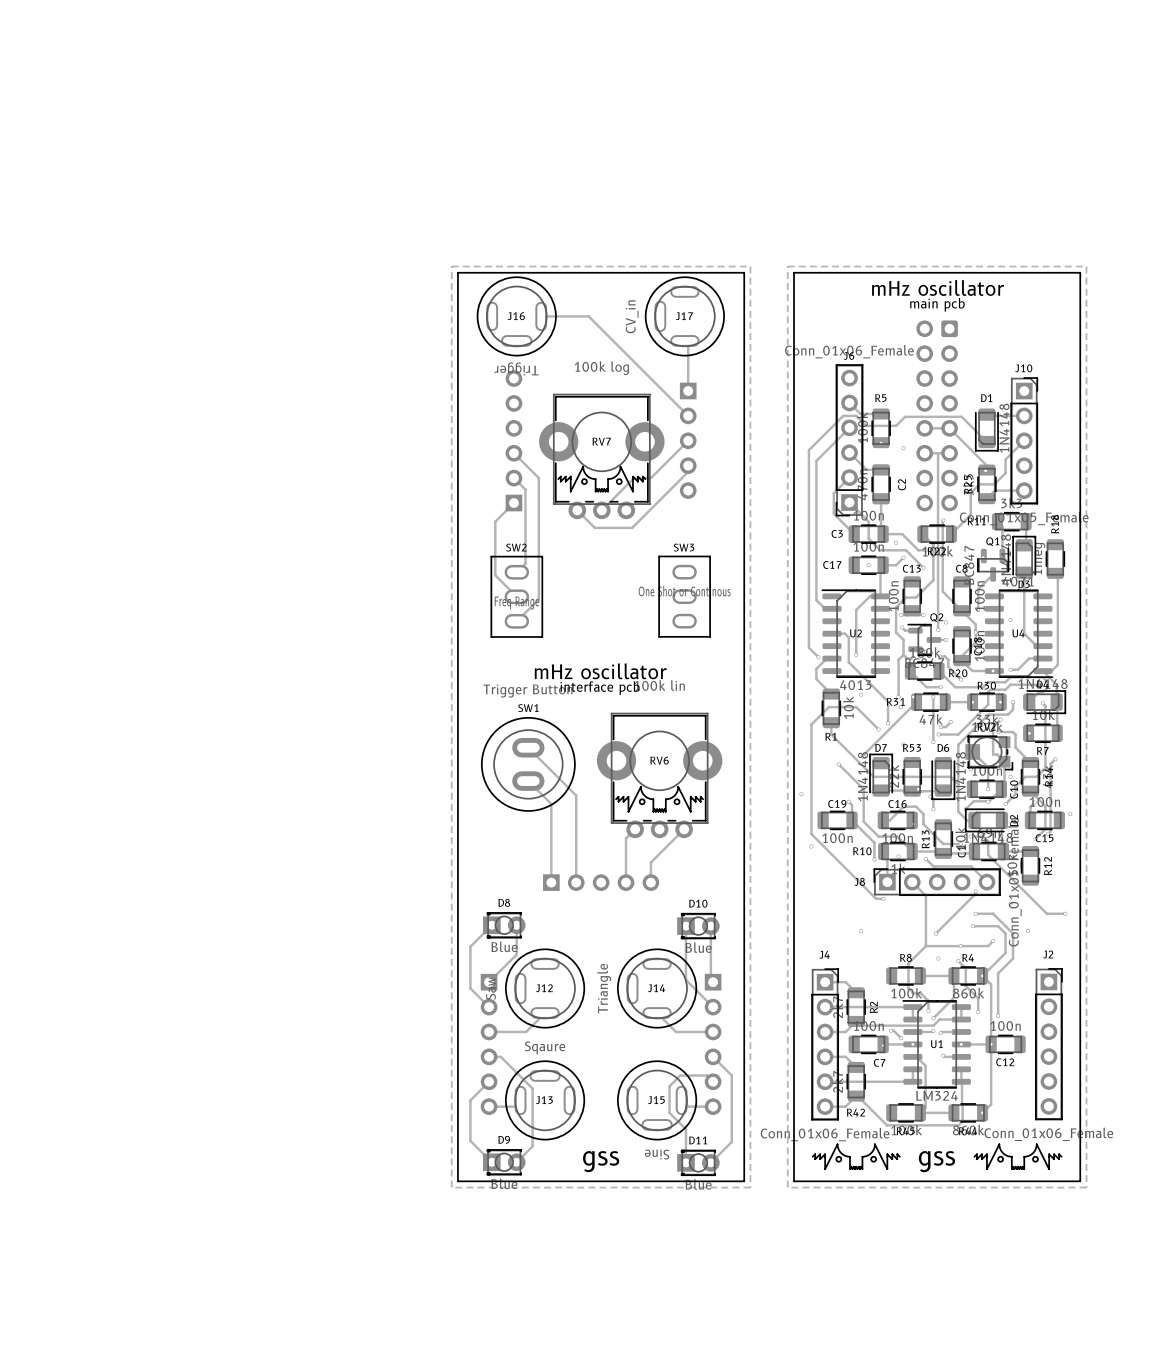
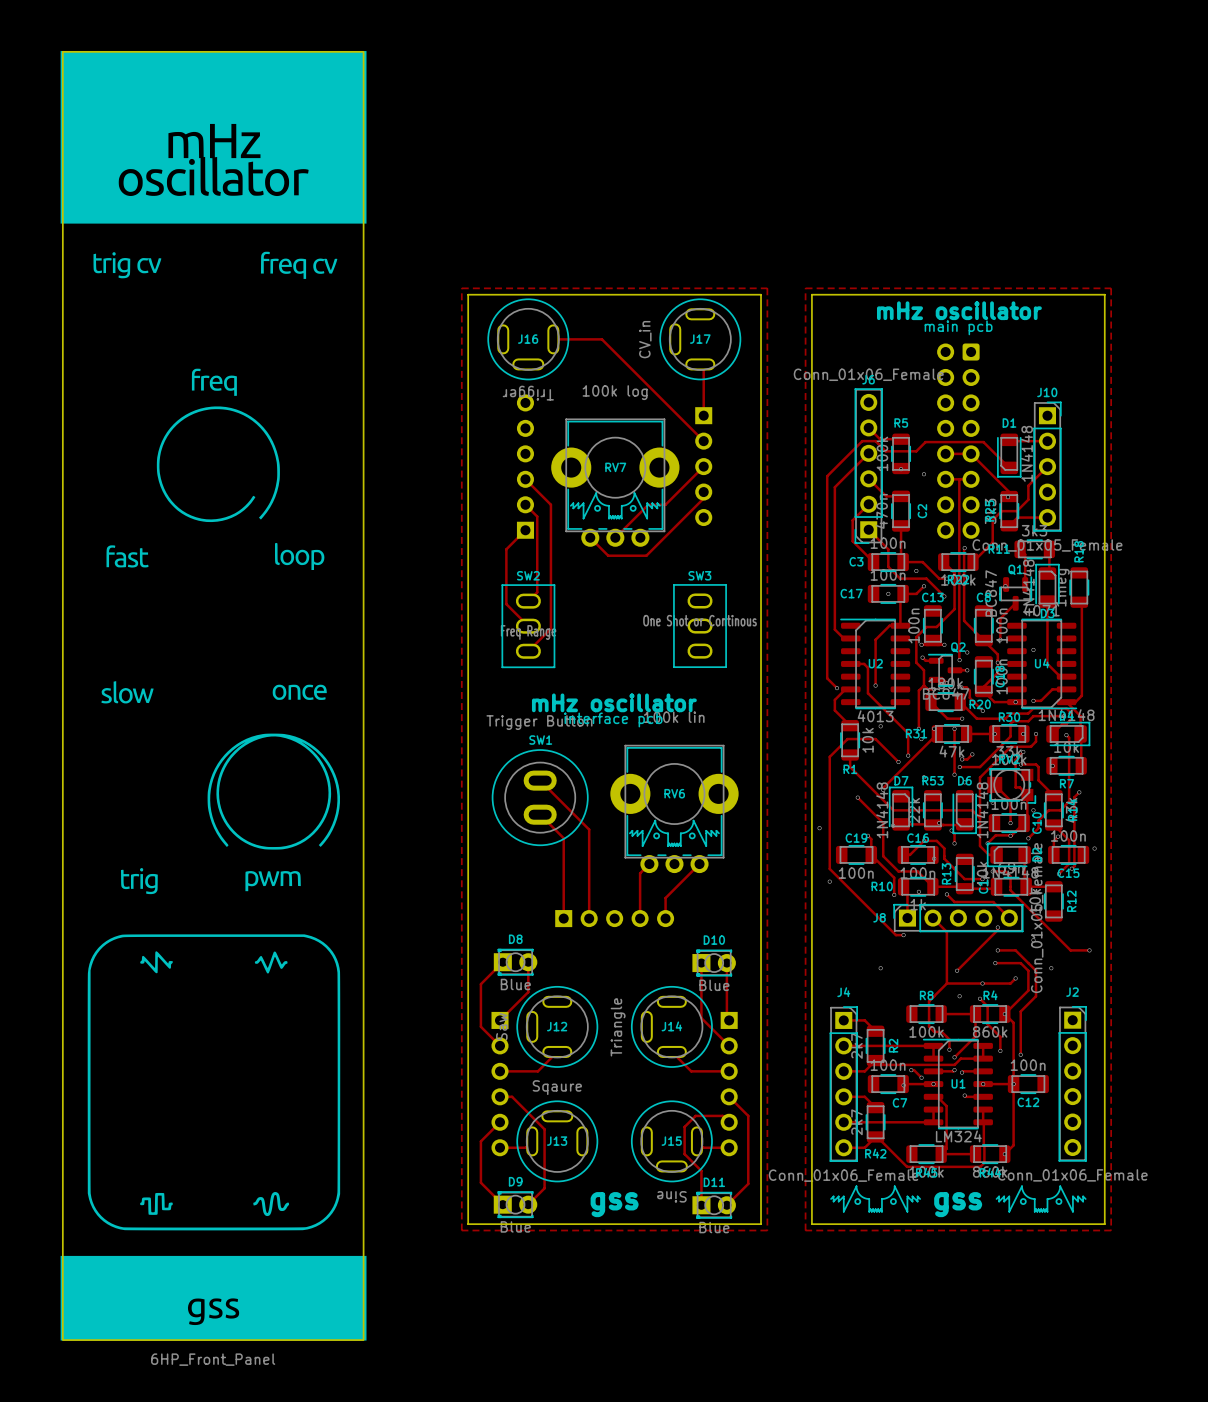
drawing: none -> [60, 51, 367, 1341]
part: none -> 6HP_Front_Panel (213, 695)

